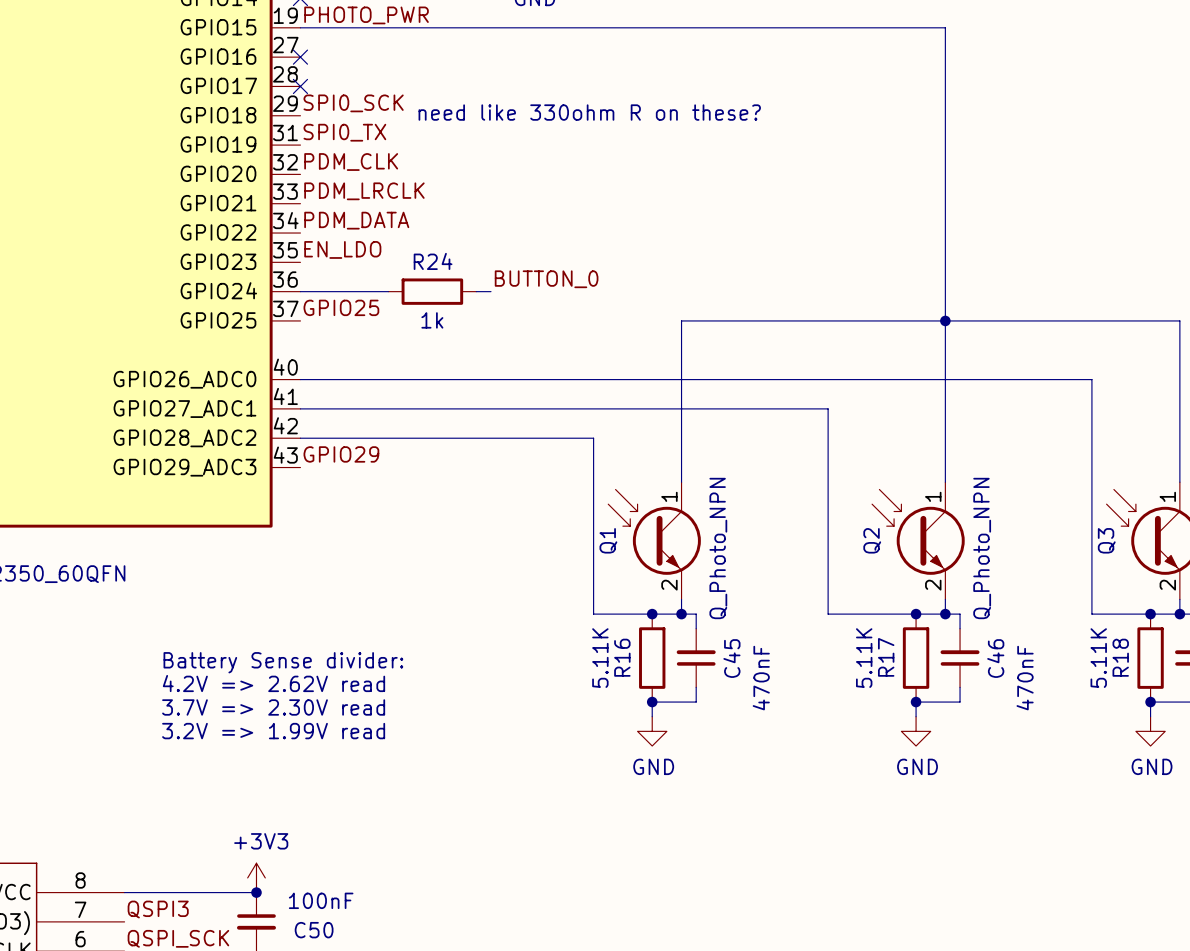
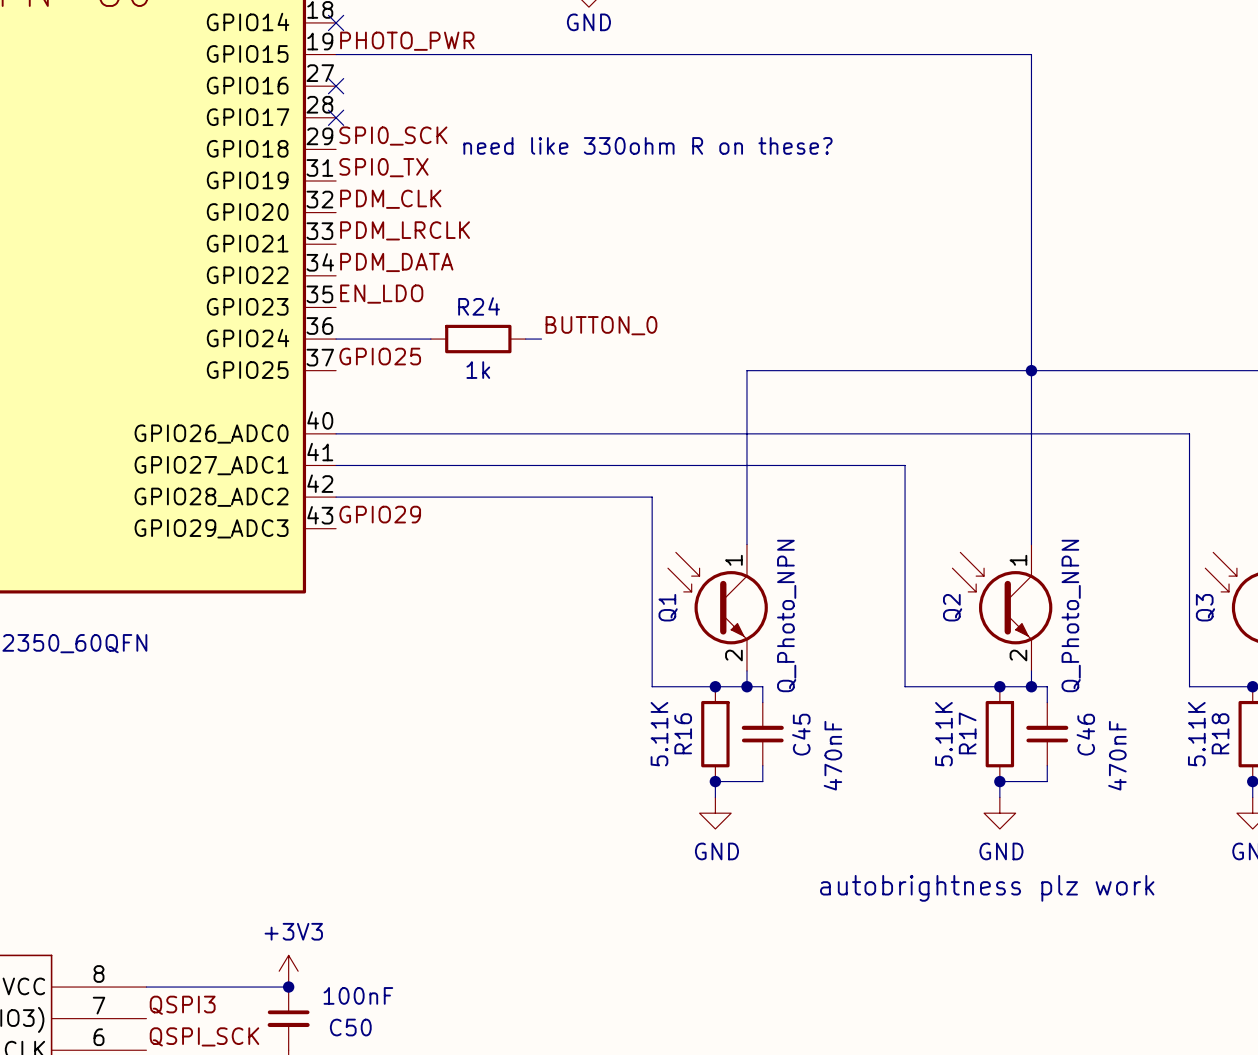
text: Battery Sense divider: (283, 662) -> none
text: 4.2V => 2.62V read (273, 683) -> none
text: 3.7V => 2.30V read (273, 707) -> none
text: 3.2V => 1.99V read (273, 731) -> none
text: none -> autobrightness plz work (987, 888)

